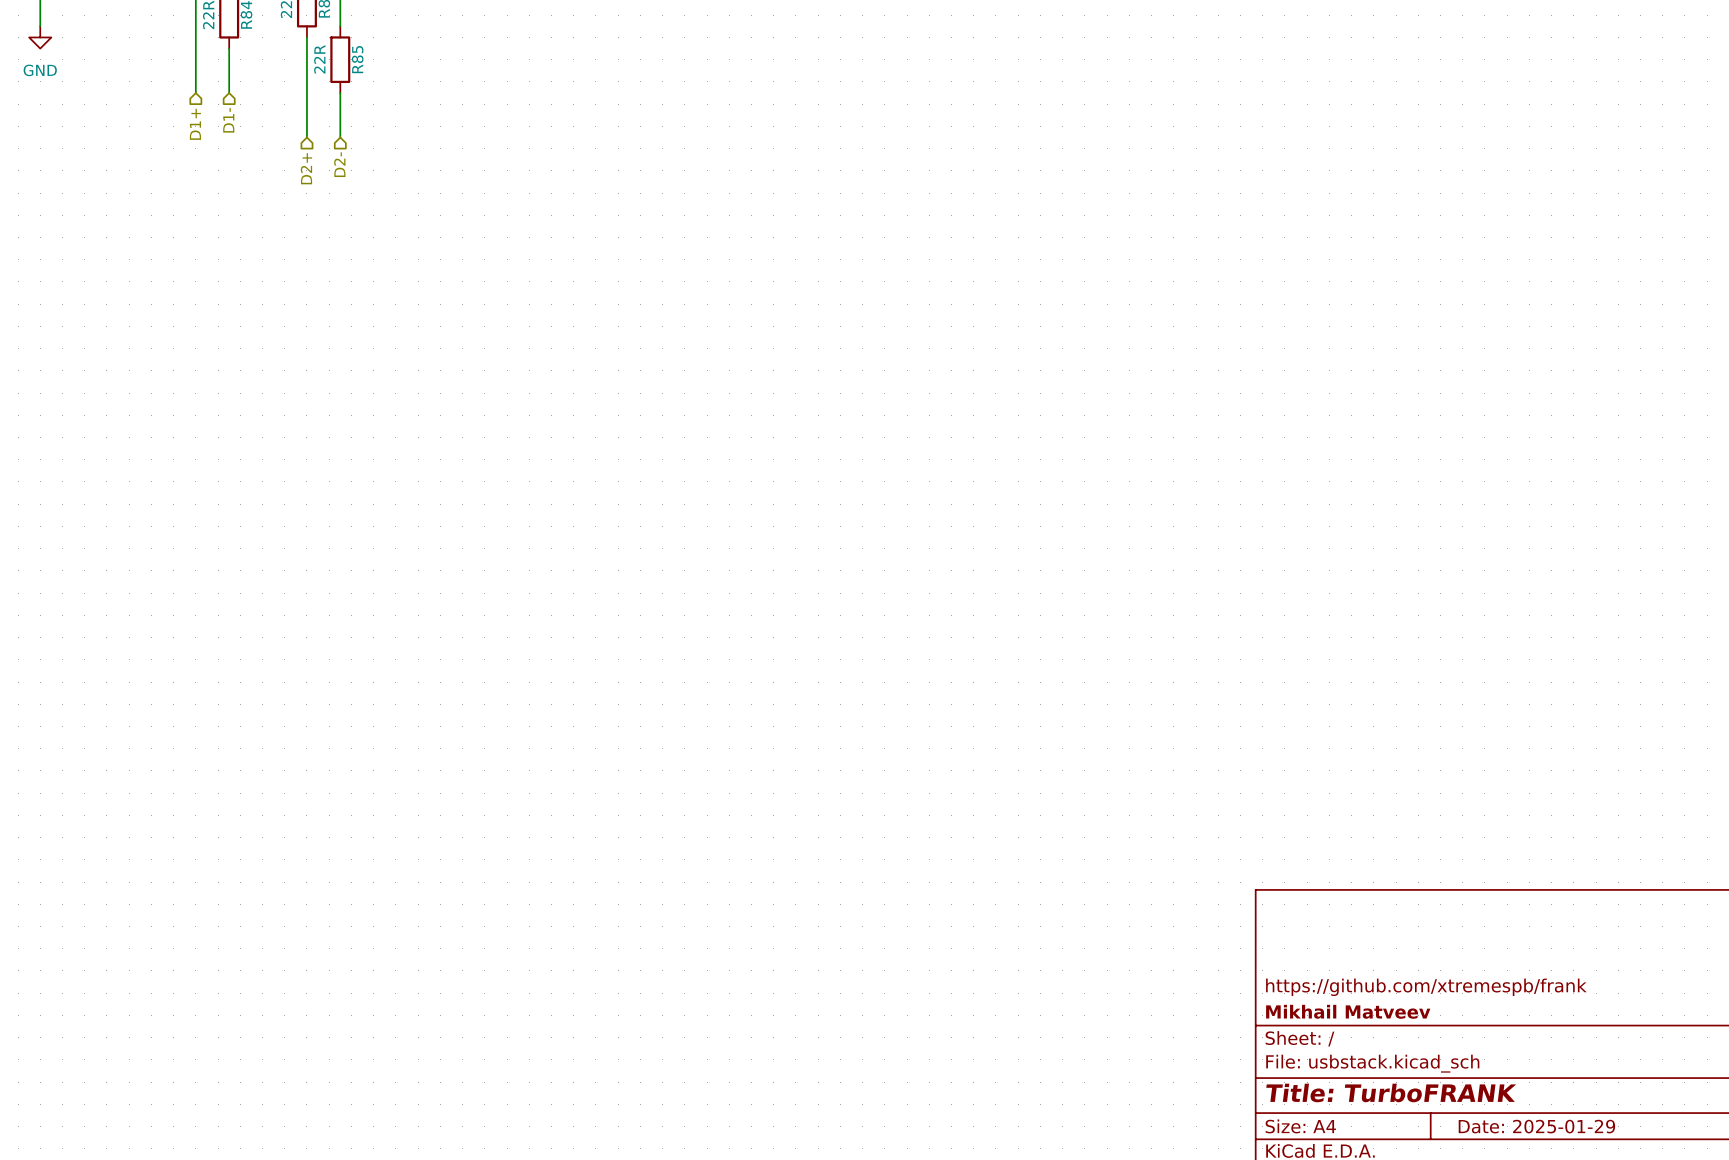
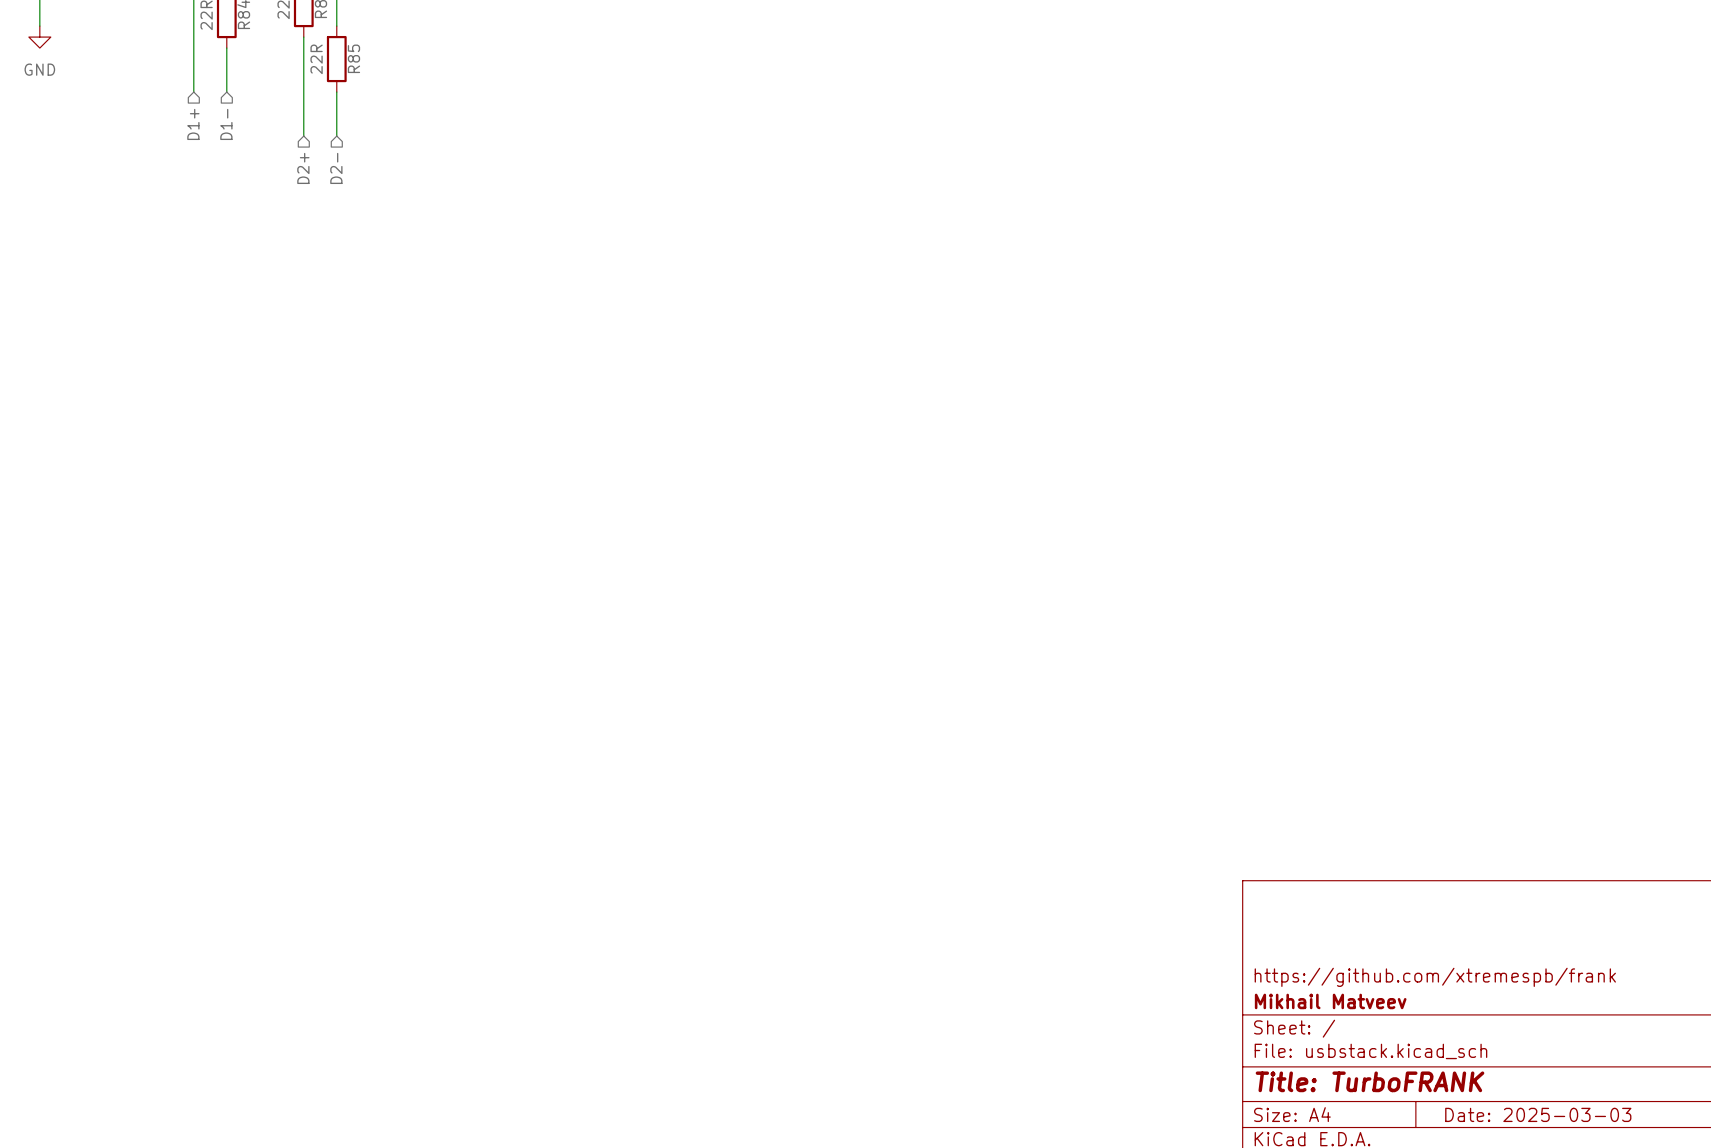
title block: Date: 2025-01-29 (1536, 1126) -> Date: 2025-03-03 (1538, 1114)

